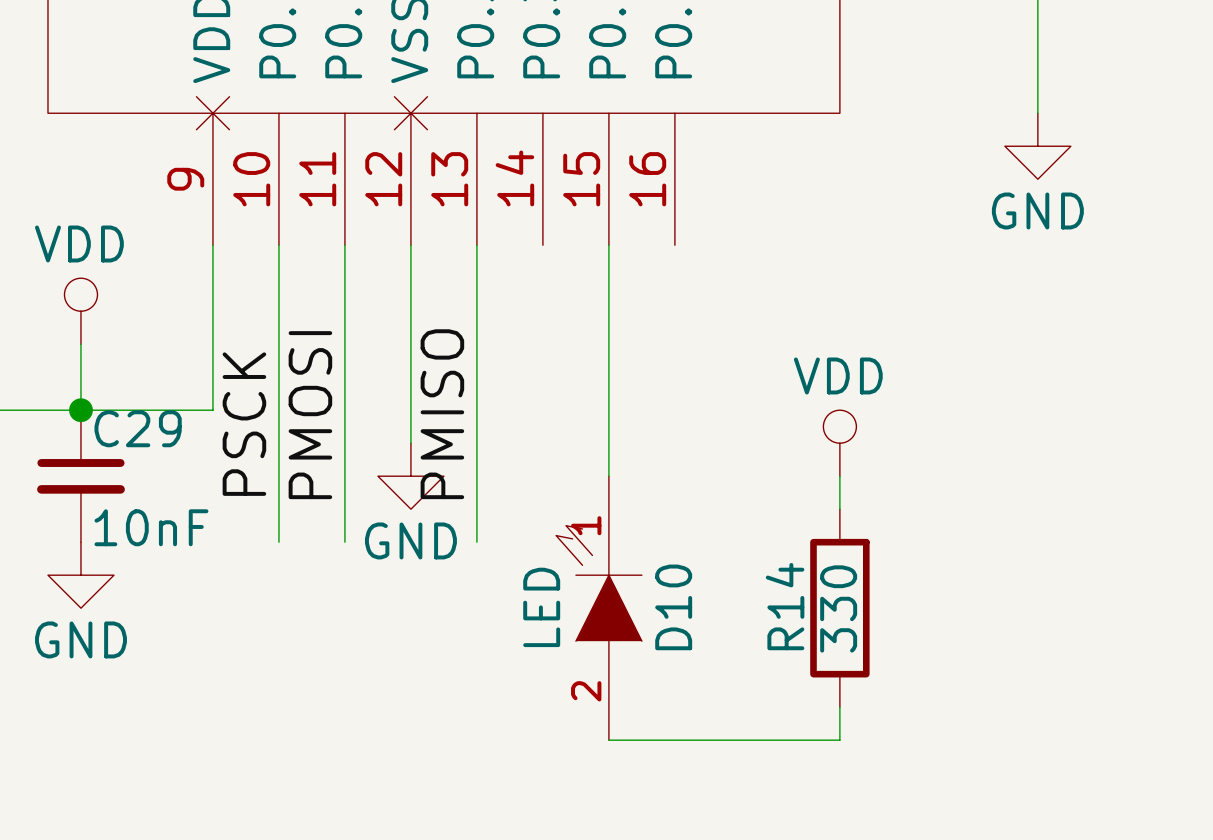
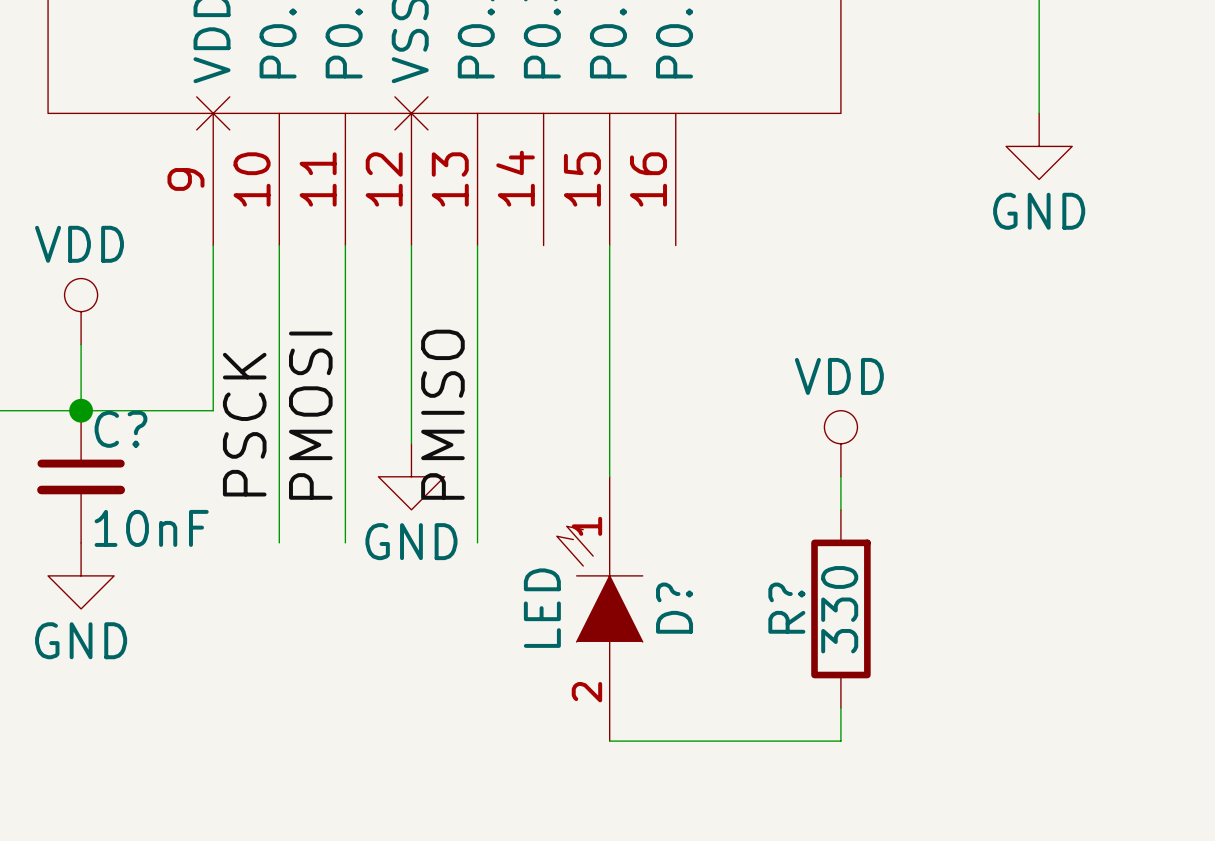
C29 name: C29 (138, 428) -> C? (120, 429)
R14 name: R14 (785, 606) -> R? (786, 608)
D10 name: D10 (673, 607) -> D? (674, 608)

